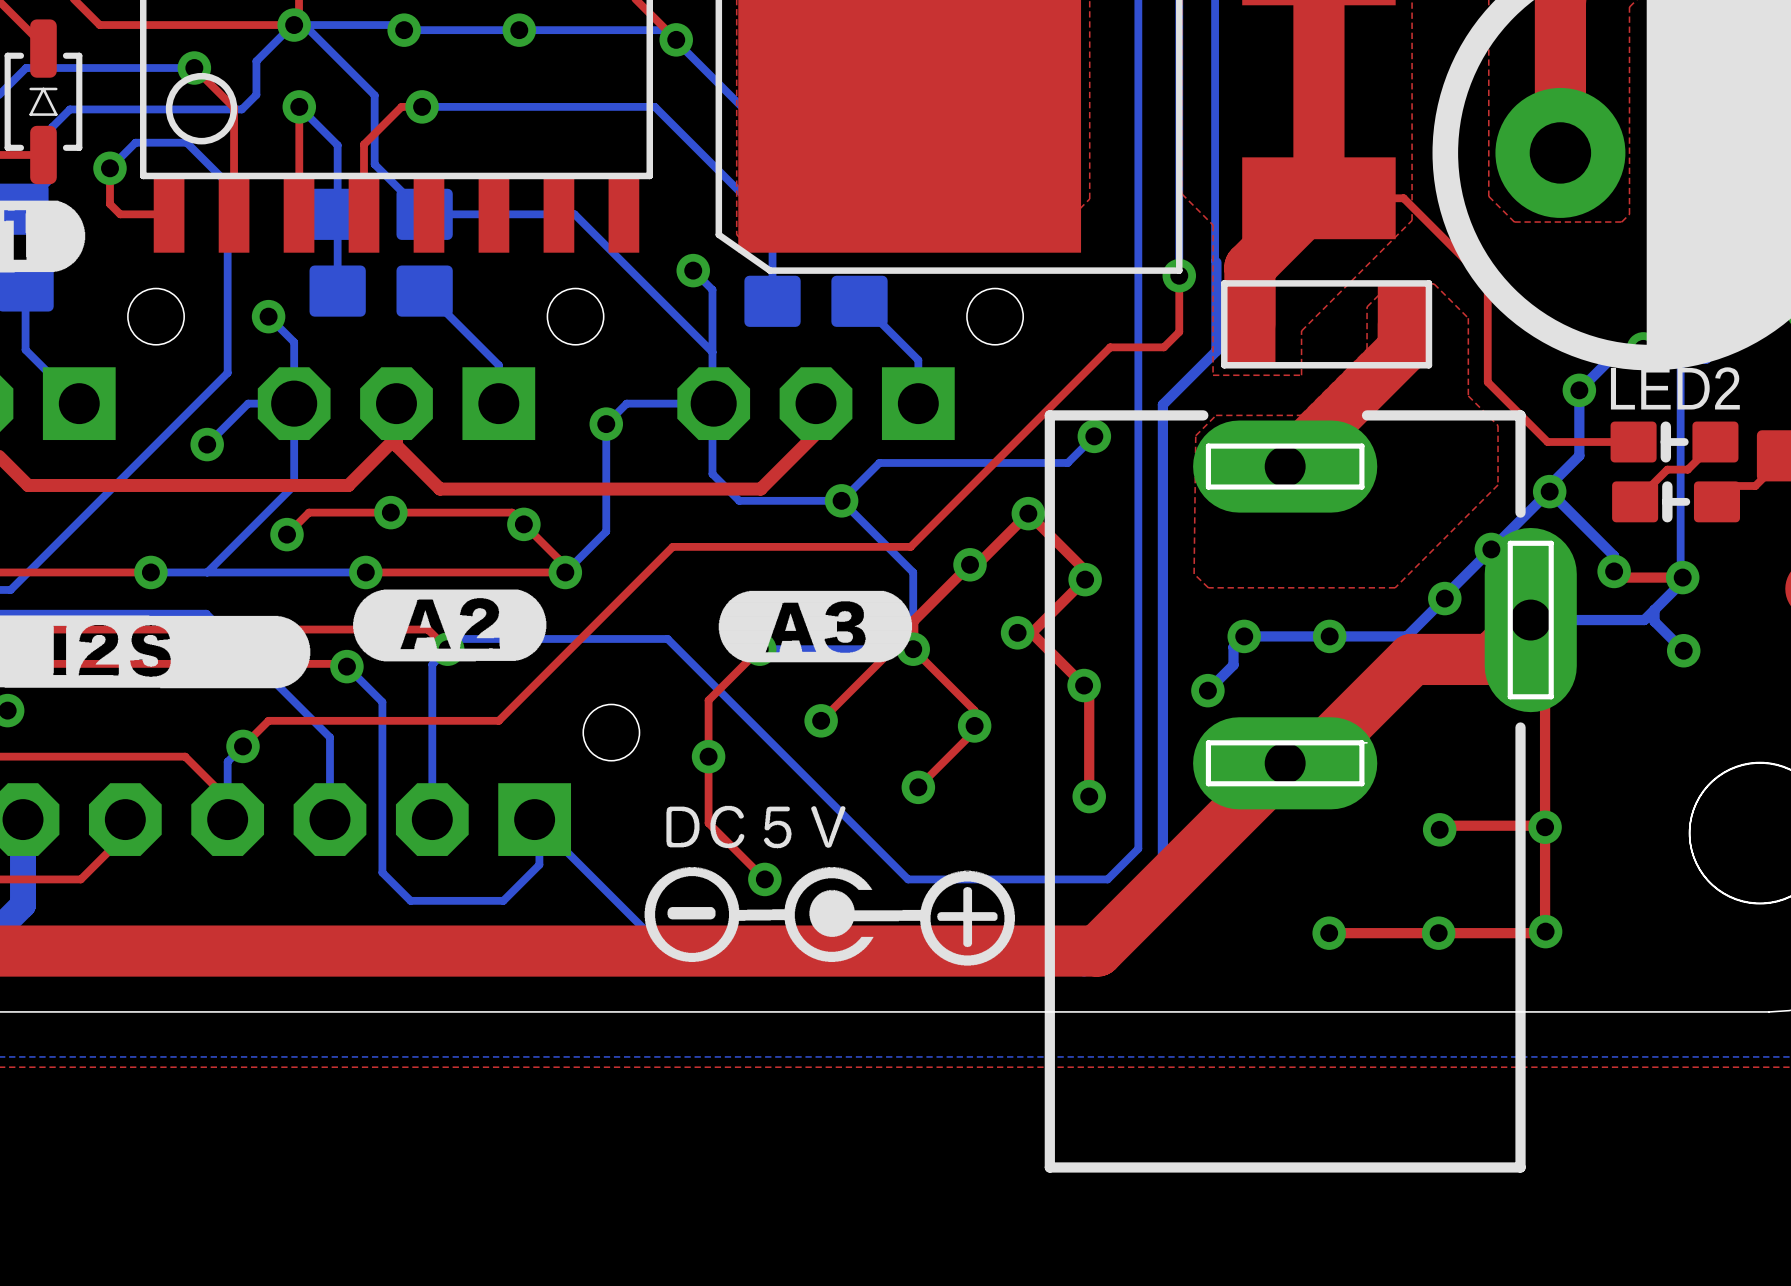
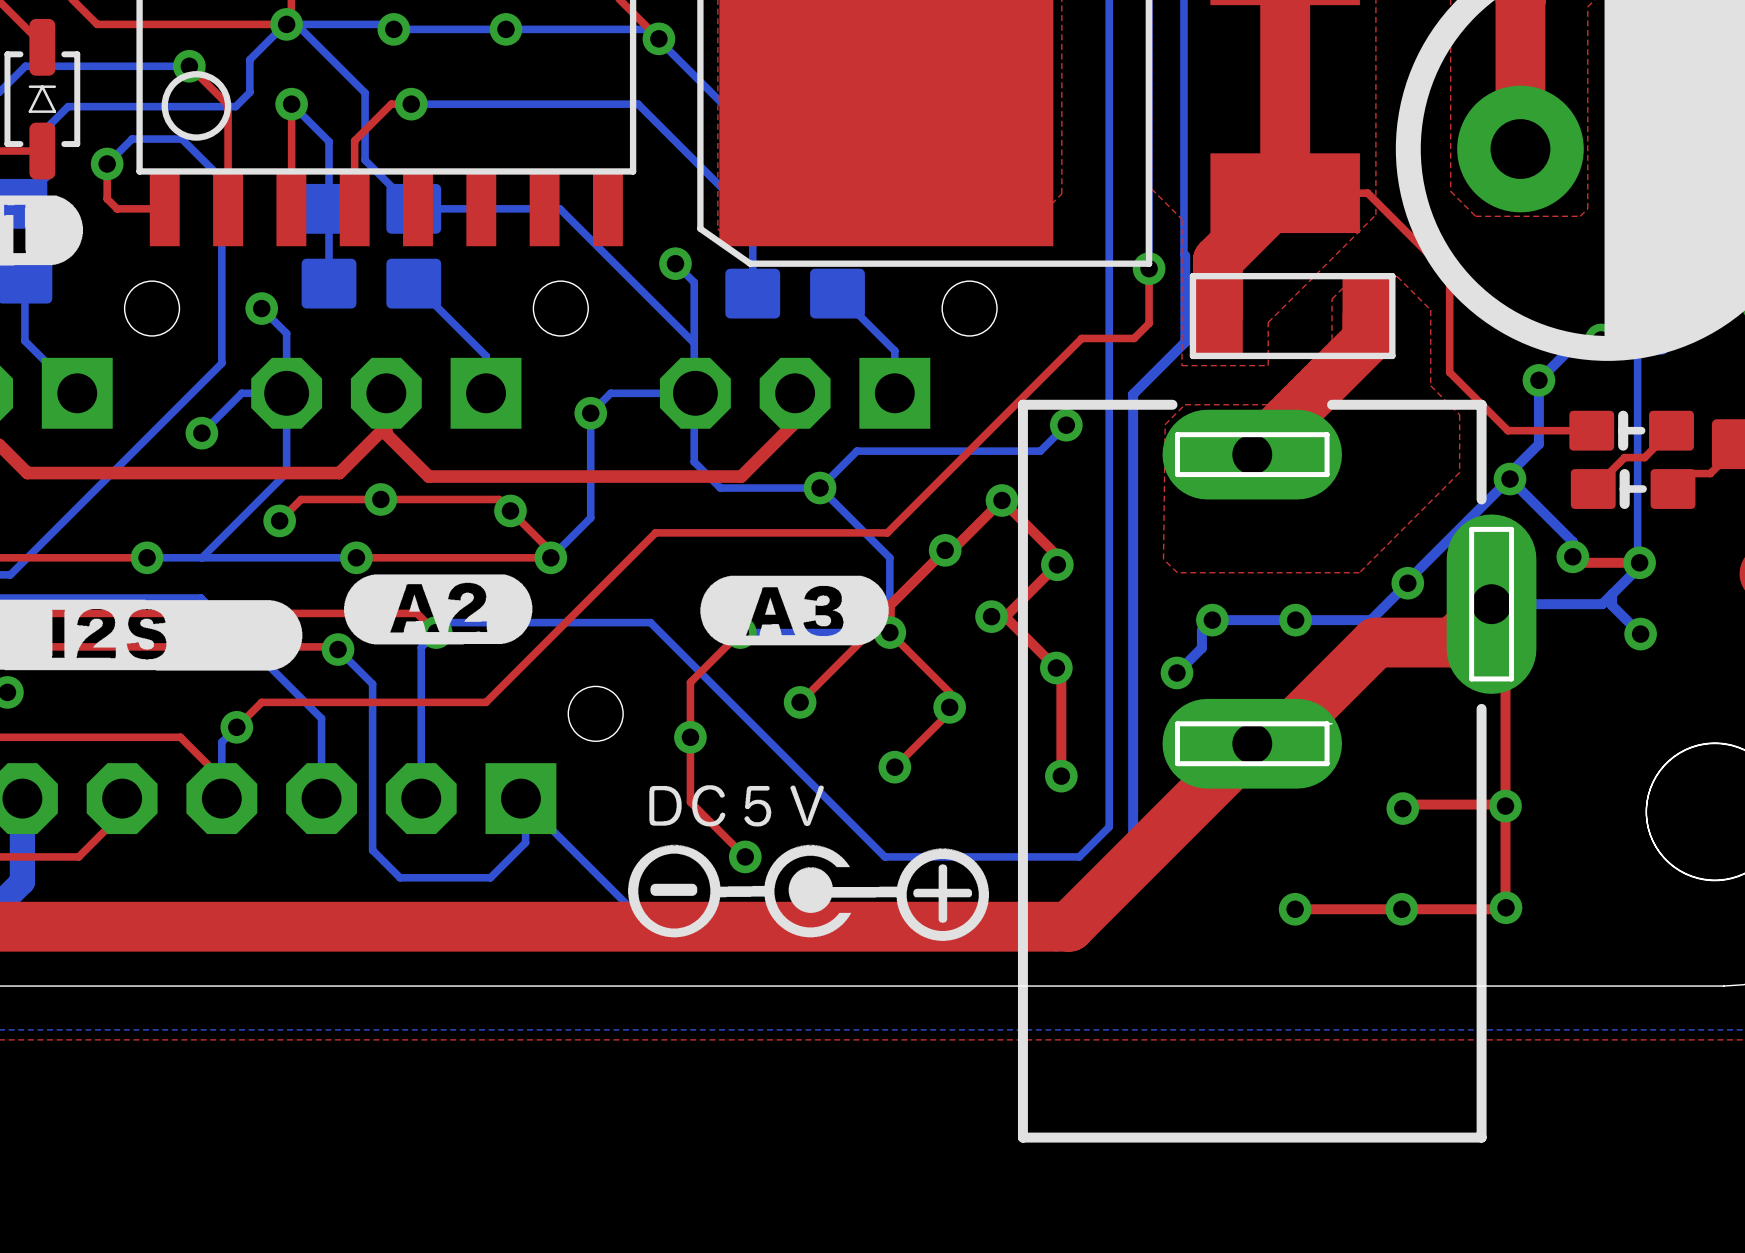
LED2 name: LED2 (1675, 388) -> none
via: (1491, 549) -> none

